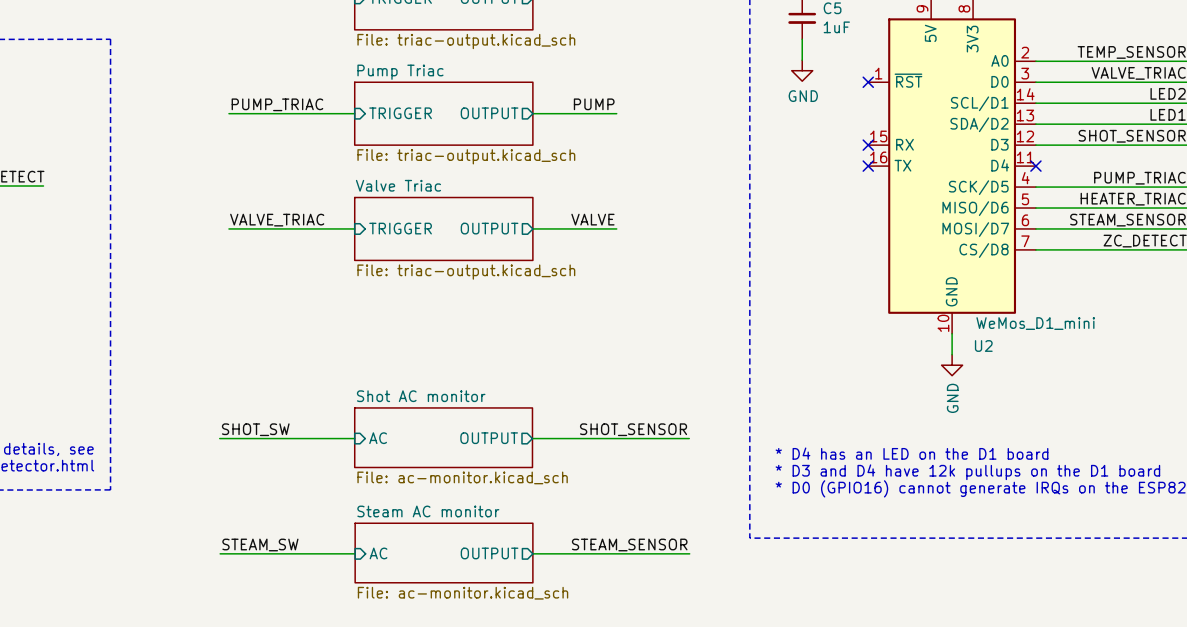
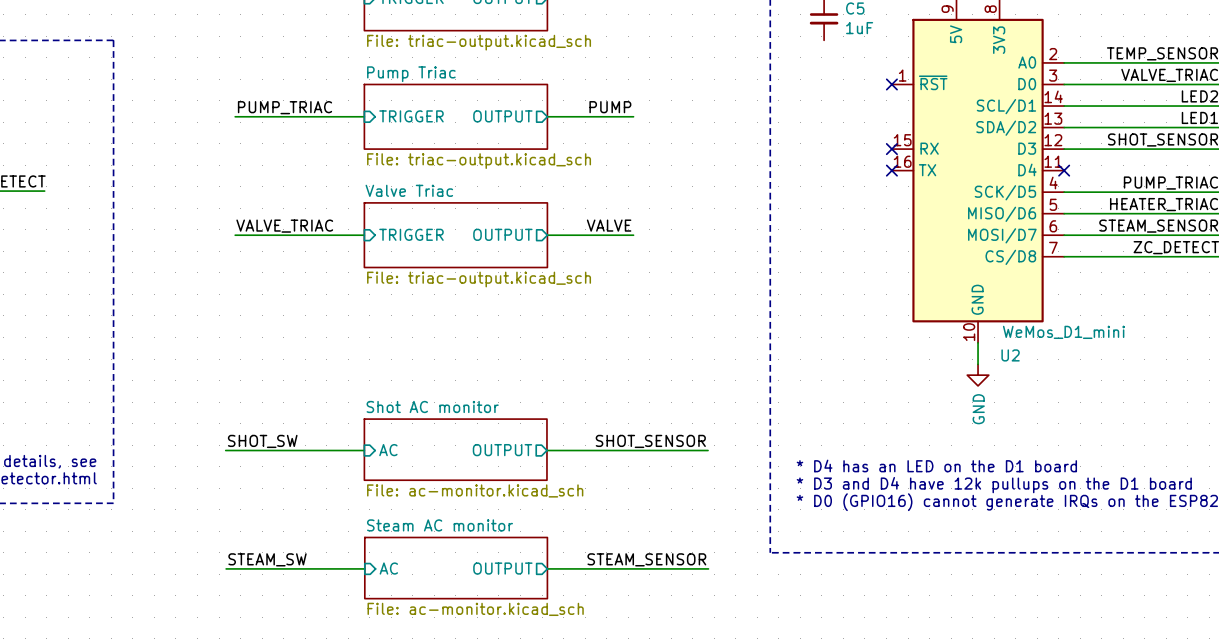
wire: (802, 39) (802, 60) -> none
power symbol: GND (802, 70) -> none

